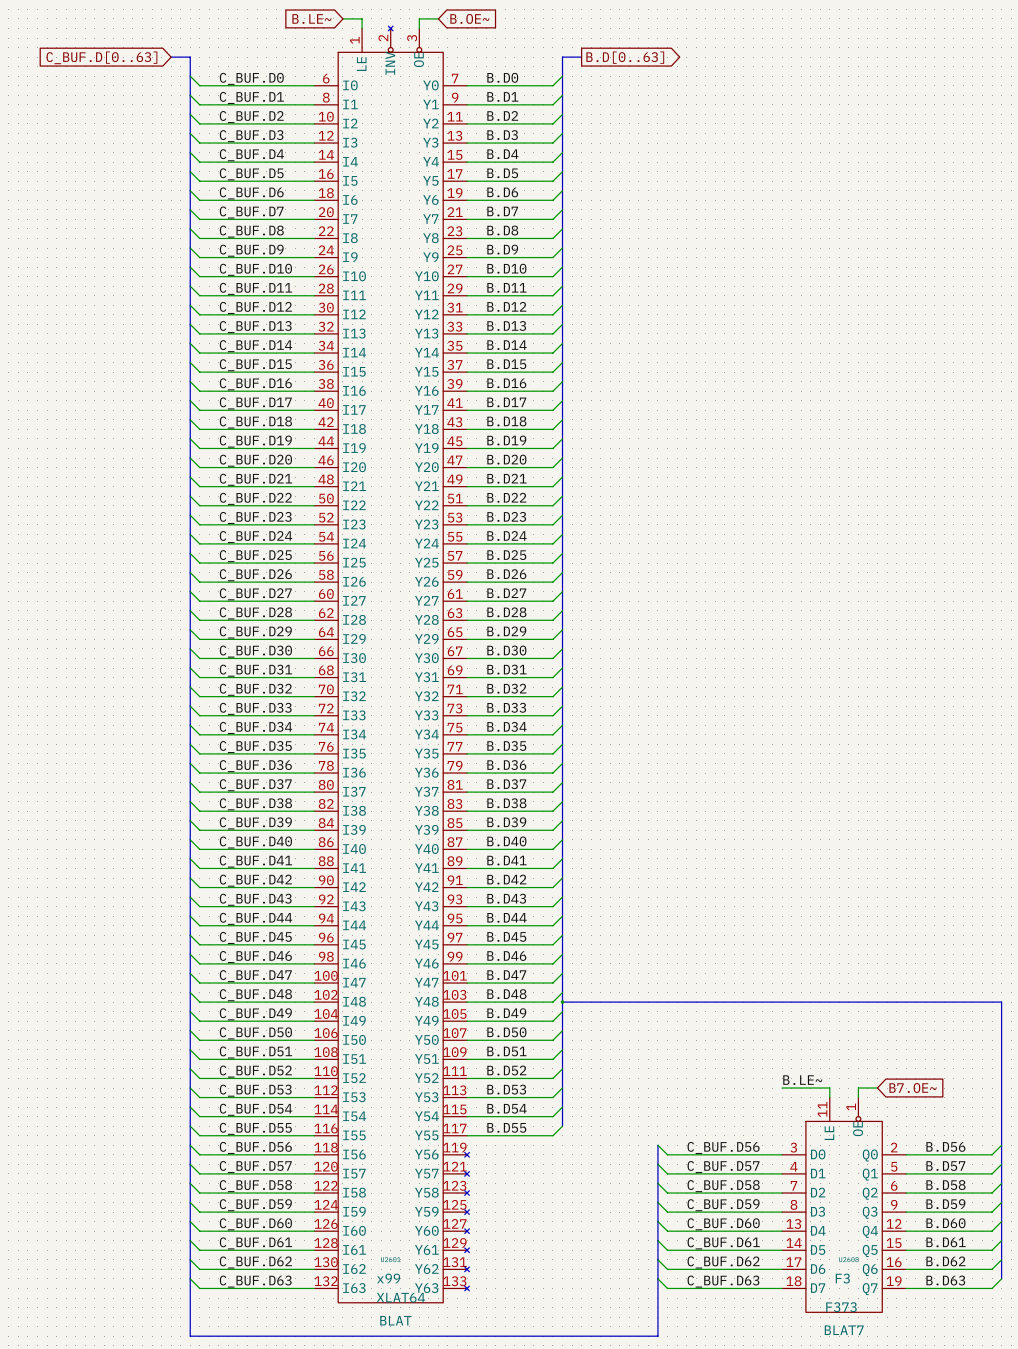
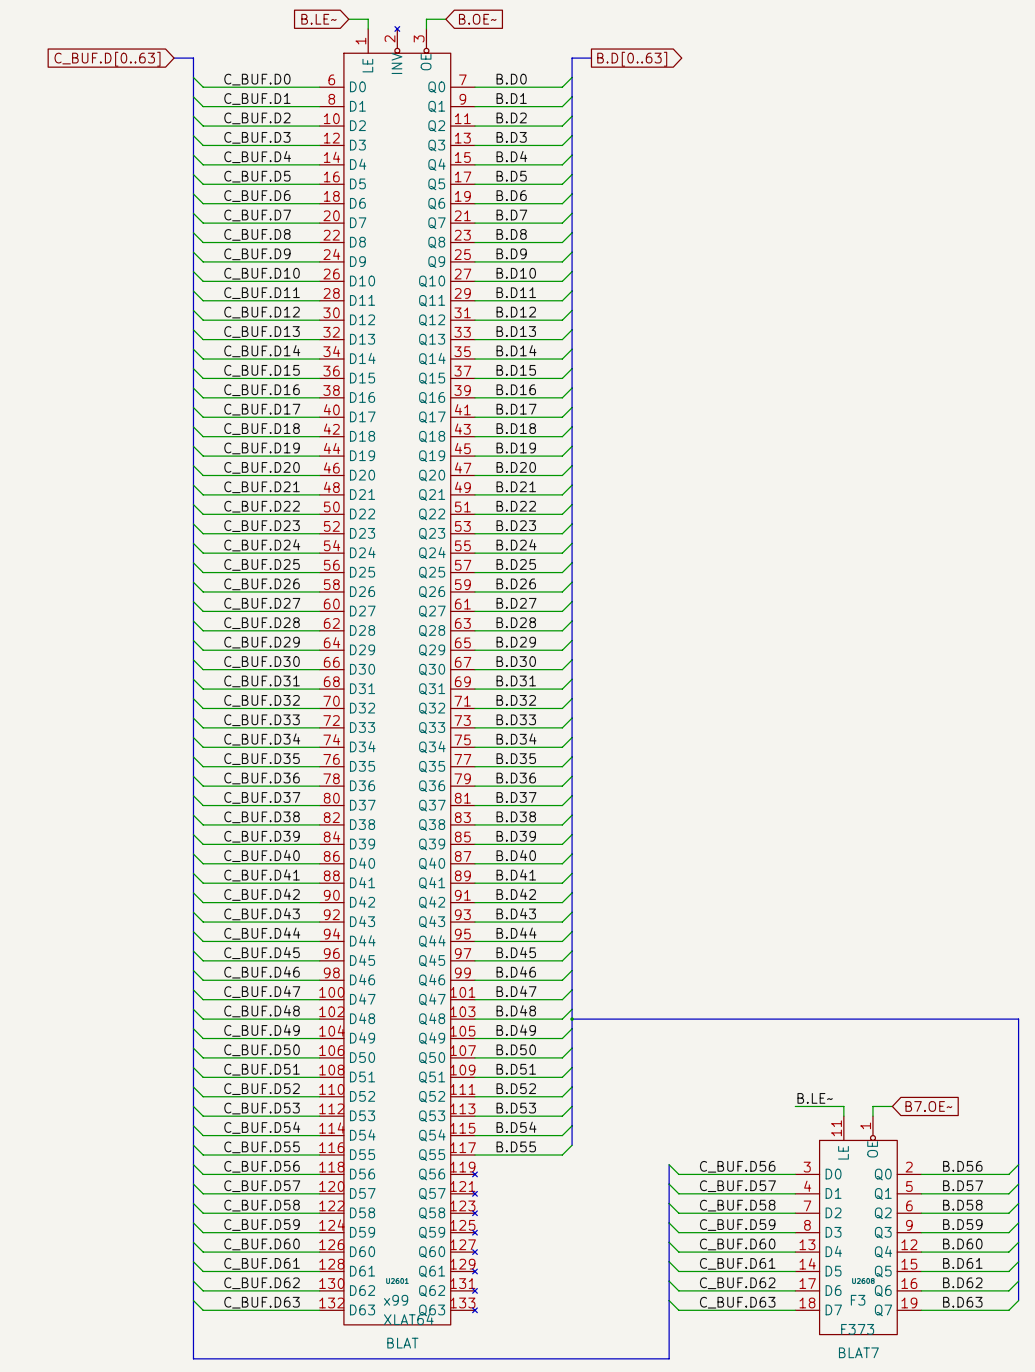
part symbol: [314, 28, 468, 1303] -> [319, 28, 475, 1325]

